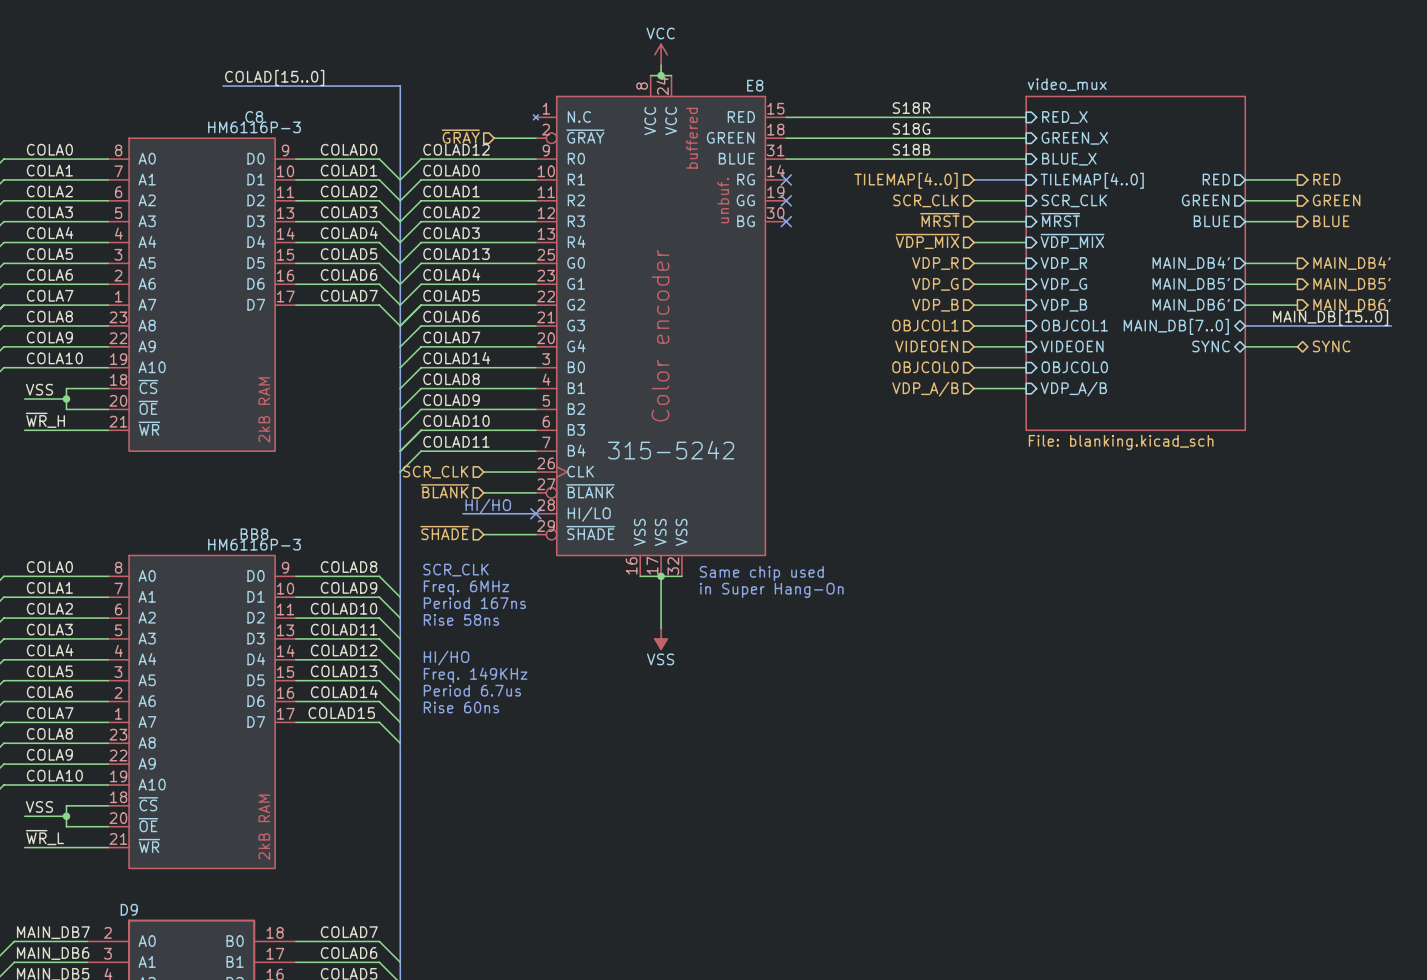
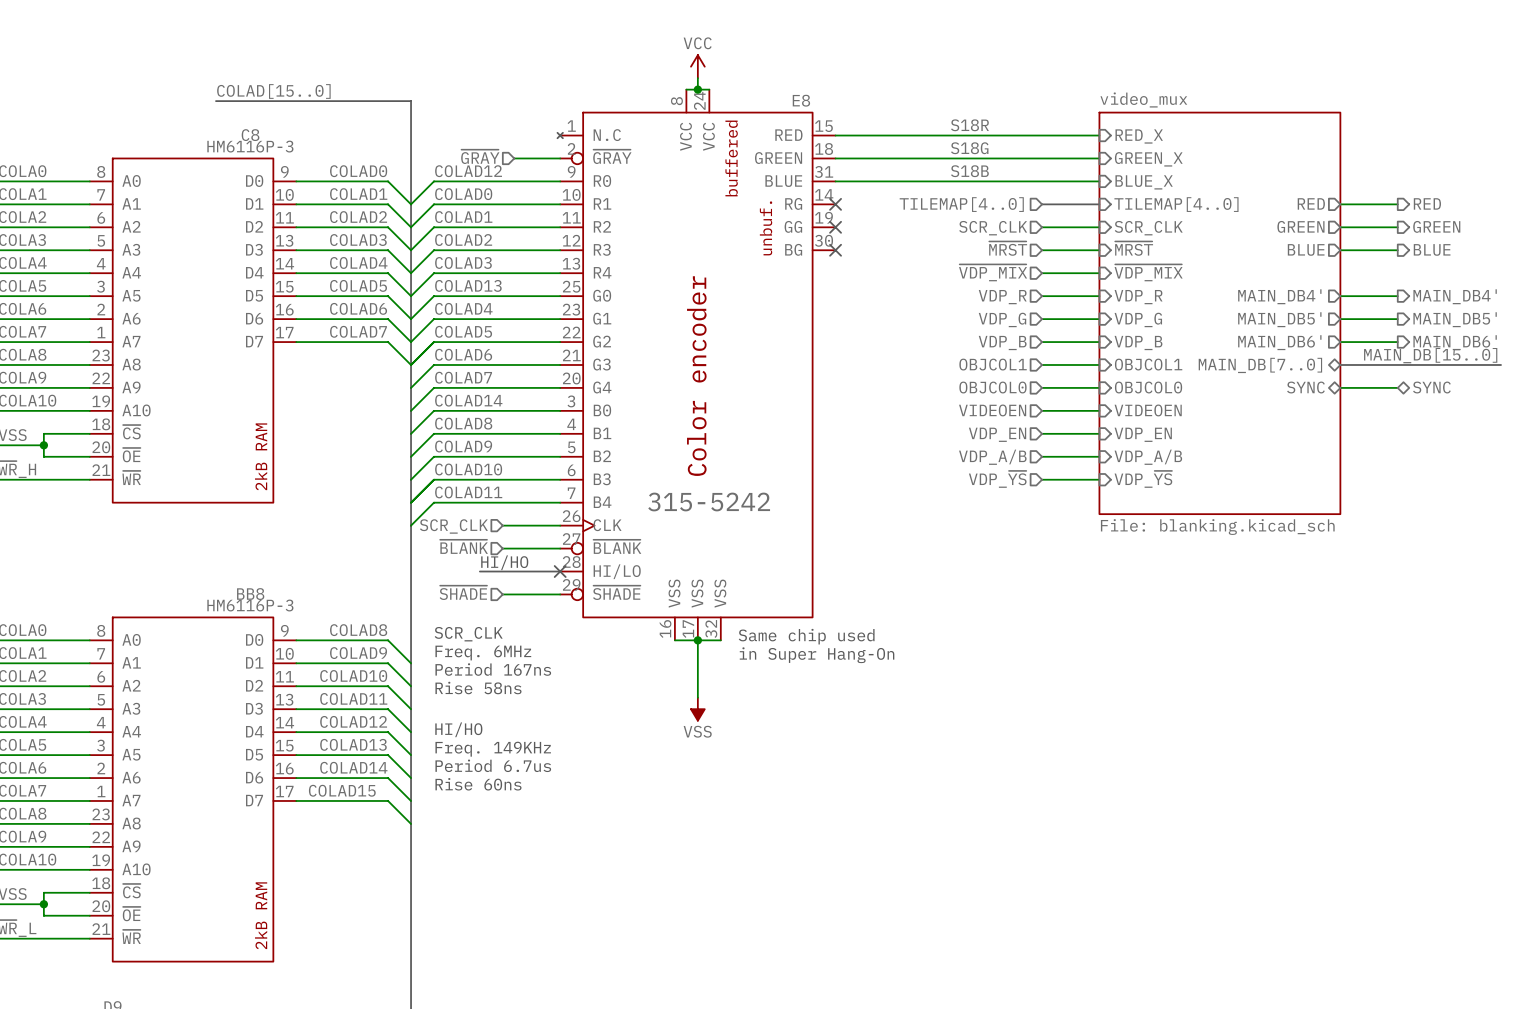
sheet video_mux: File: blanking.kicad_sch (1135, 263) -> none
sheet video_mux: none -> File: blanking.kicad_sch (1219, 313)
hierarchical label: VIDEOEN (926, 346) -> OBJCOL0 (992, 387)
sheet pin: VIDEOEN (1072, 346) -> OBJCOL0 (1148, 387)
hierarchical label: OBJCOL0 (925, 367) -> VIDEOEN (992, 410)
sheet pin: OBJCOL0 (1074, 367) -> VIDEOEN (1148, 410)
hierarchical label: VDP_A/B (925, 389) -> VDP_EN (997, 434)
sheet pin: VDP_A/B (1073, 389) -> VDP_EN (1143, 434)
wire: none -> (1042, 456) (1099, 456)
hierarchical label: none -> VDP_A/B (992, 457)
sheet pin: none -> VDP_A/B (1148, 457)
hierarchical label: none -> VDP_~{YS} (997, 479)
sheet pin: none -> VDP_~{YS} (1143, 479)
wire: none -> (1042, 479) (1099, 479)

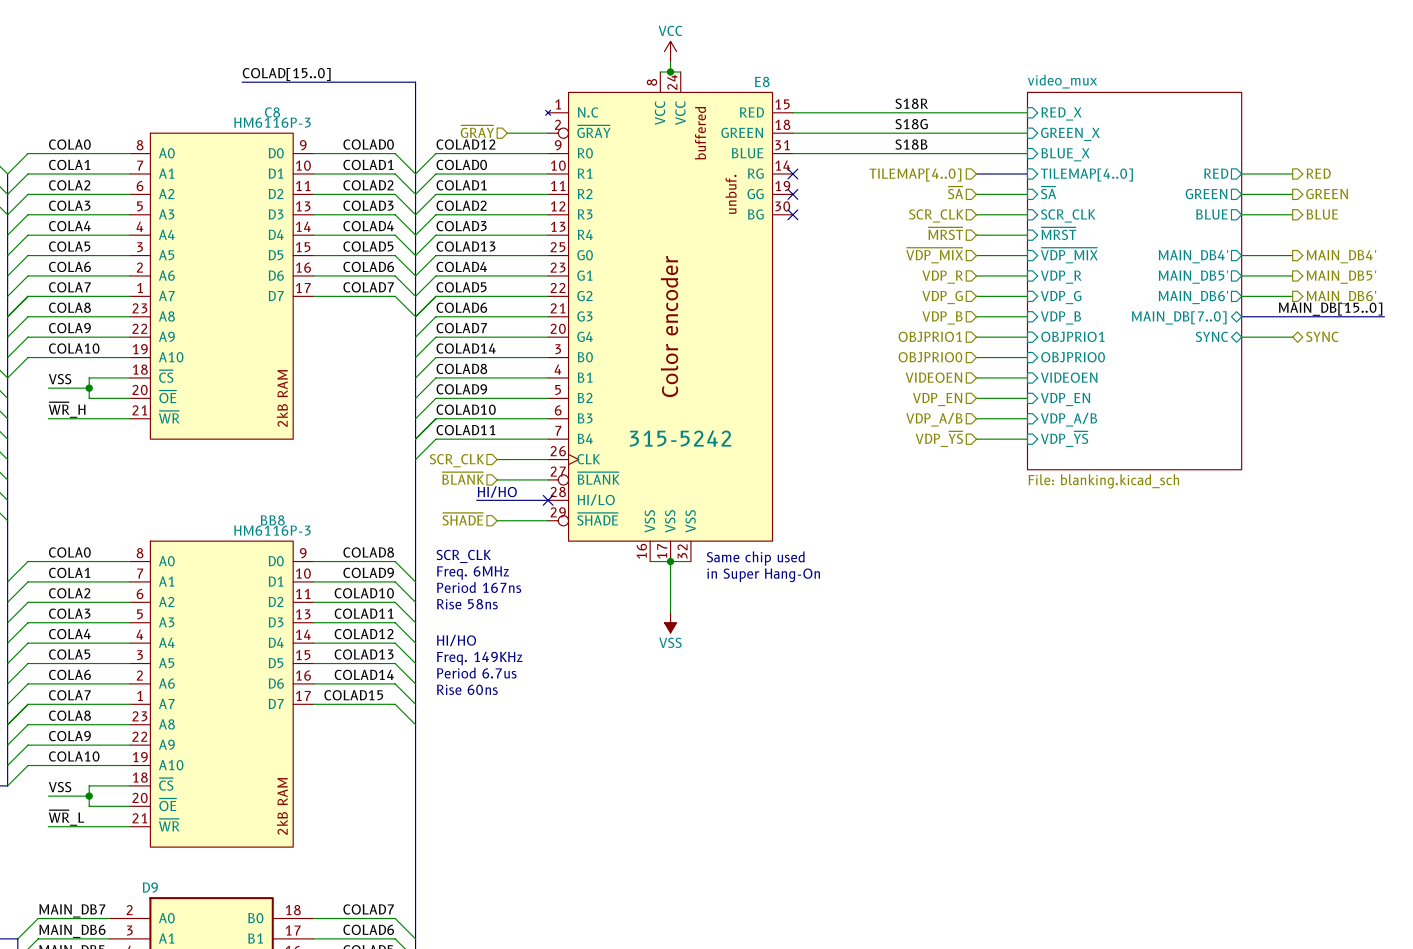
hierarchical label: SCR_CLK (993, 228) -> ~{SA} (955, 192)
sheet pin: SCR_CLK (1148, 228) -> ~{SA} (1048, 192)
hierarchical label: ~{MRST} (1008, 248) -> SCR_CLK (936, 215)
sheet pin: ~{MRST} (1134, 248) -> SCR_CLK (1068, 215)
hierarchical label: ~{VDP_MIX} (993, 272) -> ~{MRST} (945, 233)
sheet pin: ~{VDP_MIX} (1148, 272) -> ~{MRST} (1058, 233)
hierarchical label: VDP_R (1002, 297) -> ~{VDP_MIX} (934, 255)
sheet pin: VDP_R (1138, 297) -> ~{VDP_MIX} (1069, 255)
sheet video_mux: File: blanking.kicad_sch (1219, 313) -> none
hierarchical label: VDP_G (1002, 319) -> VDP_R (942, 277)
sheet pin: VDP_G (1138, 319) -> VDP_R (1061, 277)
sheet video_mux: none -> File: blanking.kicad_sch (1134, 281)
hierarchical label: VDP_B (1002, 343) -> VDP_G (942, 297)
sheet pin: VDP_B (1138, 343) -> VDP_G (1061, 297)
hierarchical label: OBJCOL1 (993, 364) -> VDP_B (942, 317)
sheet pin: OBJCOL1 (1148, 364) -> VDP_B (1060, 317)
hierarchical label: OBJCOL0 (992, 387) -> OBJPRIO1 (930, 336)
sheet pin: OBJCOL0 (1148, 387) -> OBJPRIO1 (1072, 336)
hierarchical label: VIDEOEN (992, 410) -> OBJPRIO0 (930, 357)
sheet pin: VIDEOEN (1148, 410) -> OBJPRIO0 (1073, 357)
hierarchical label: VDP_EN (997, 434) -> VIDEOEN (933, 377)
sheet pin: VDP_EN (1143, 434) -> VIDEOEN (1069, 377)
hierarchical label: VDP_A/B (992, 457) -> VDP_EN (937, 399)
sheet pin: VDP_A/B (1148, 457) -> VDP_EN (1065, 399)
hierarchical label: VDP_~{YS} (997, 479) -> VDP_A/B (934, 419)
sheet pin: VDP_~{YS} (1143, 479) -> VDP_A/B (1068, 419)
hierarchical label: none -> VDP_~{YS} (939, 439)
wire: none -> (976, 439) (1027, 439)
sheet pin: none -> VDP_~{YS} (1064, 439)

